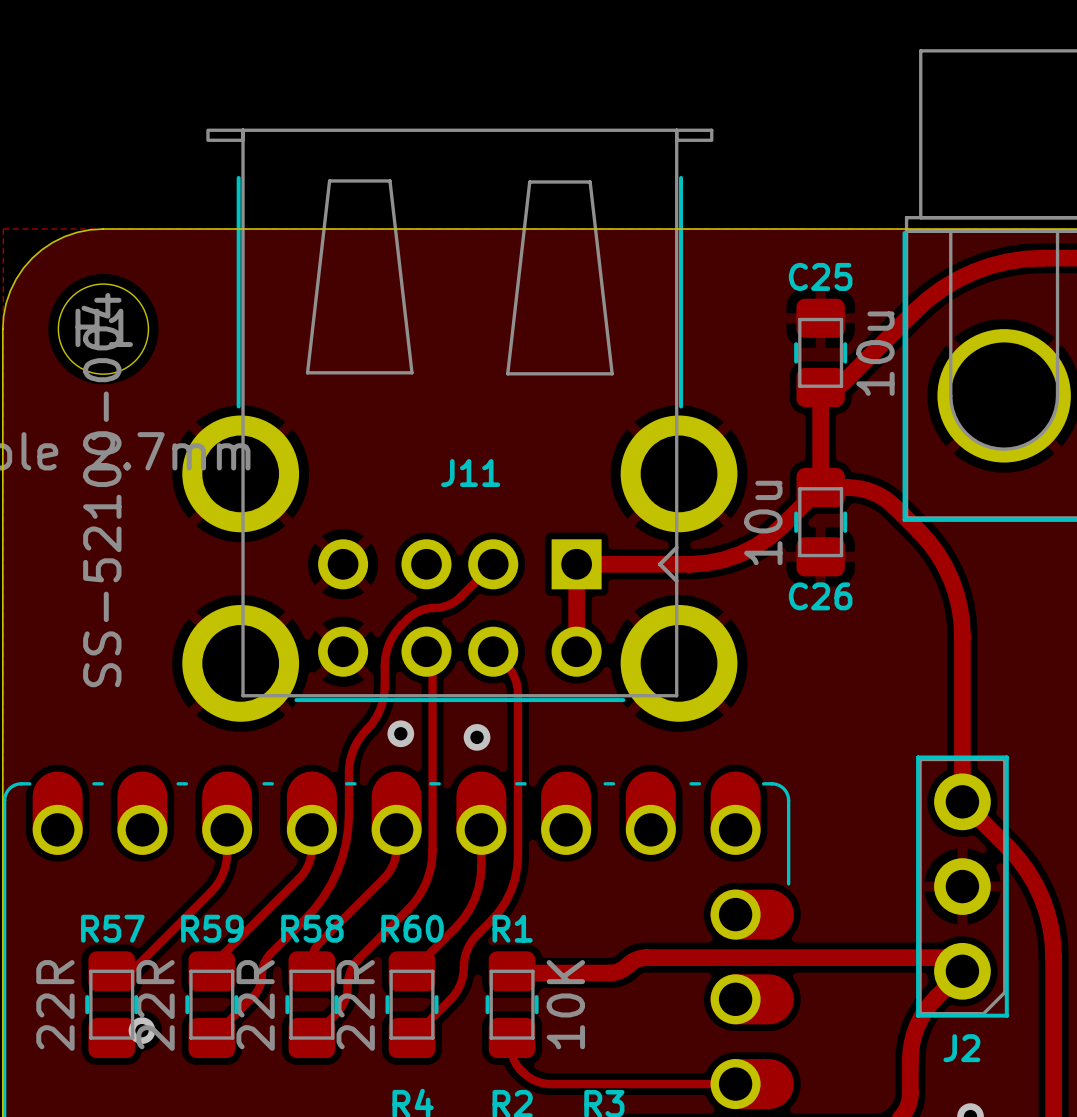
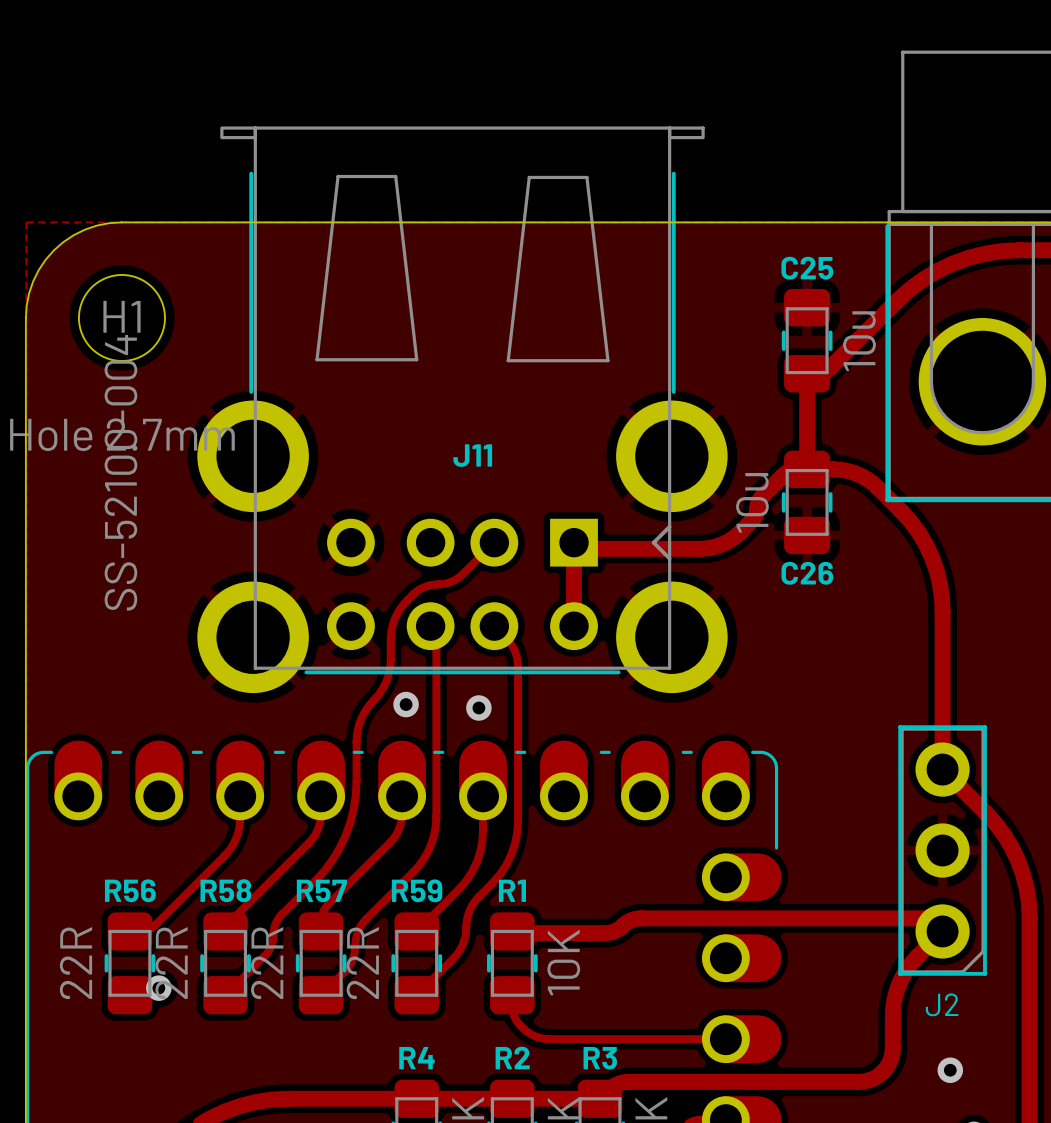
track: none -> (798, 469) (789, 471) (782, 475) (760, 498) (756, 514) (752, 520) (734, 536) (721, 544) (699, 548) (580, 548)
track: (820, 487) (769, 537) (739, 554) (723, 559) (689, 564) (576, 564) -> none
R57 name: R57 (112, 928) -> R56 (130, 890)
R59 name: R59 (212, 928) -> R58 (225, 890)
R58 name: R58 (312, 928) -> R57 (321, 890)
R60 name: R60 (412, 928) -> R59 (417, 890)

